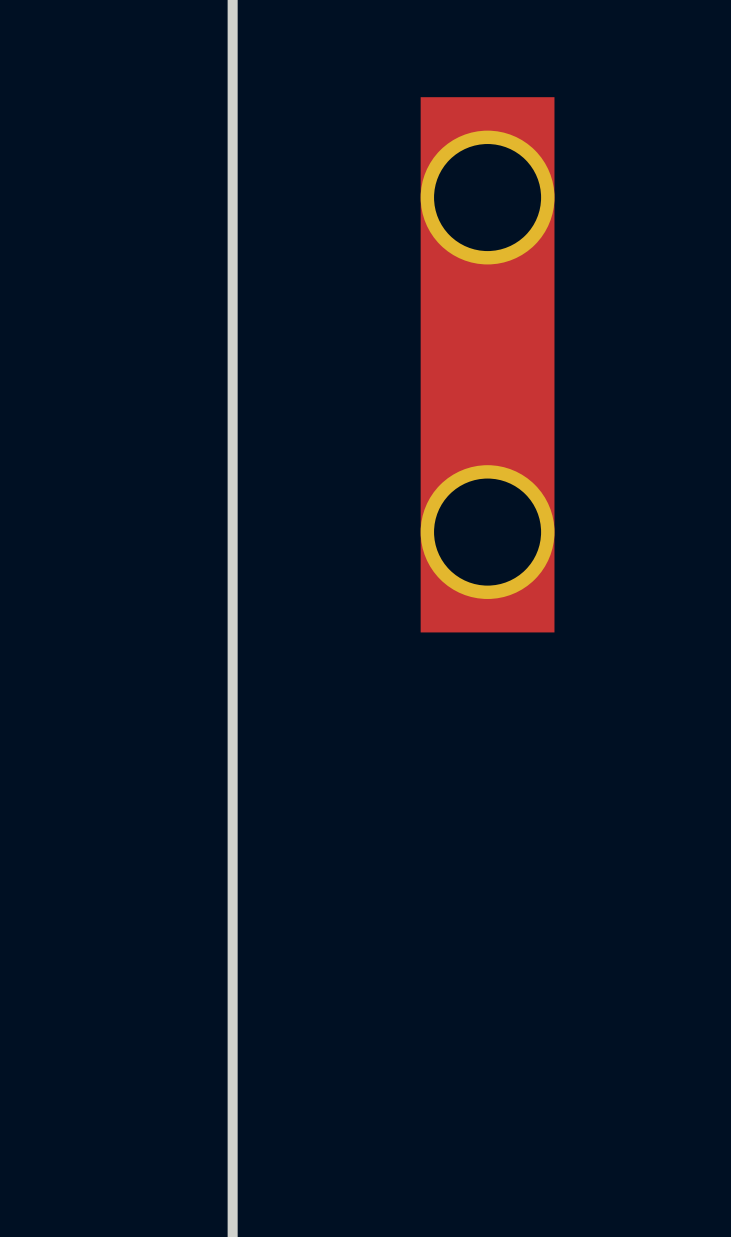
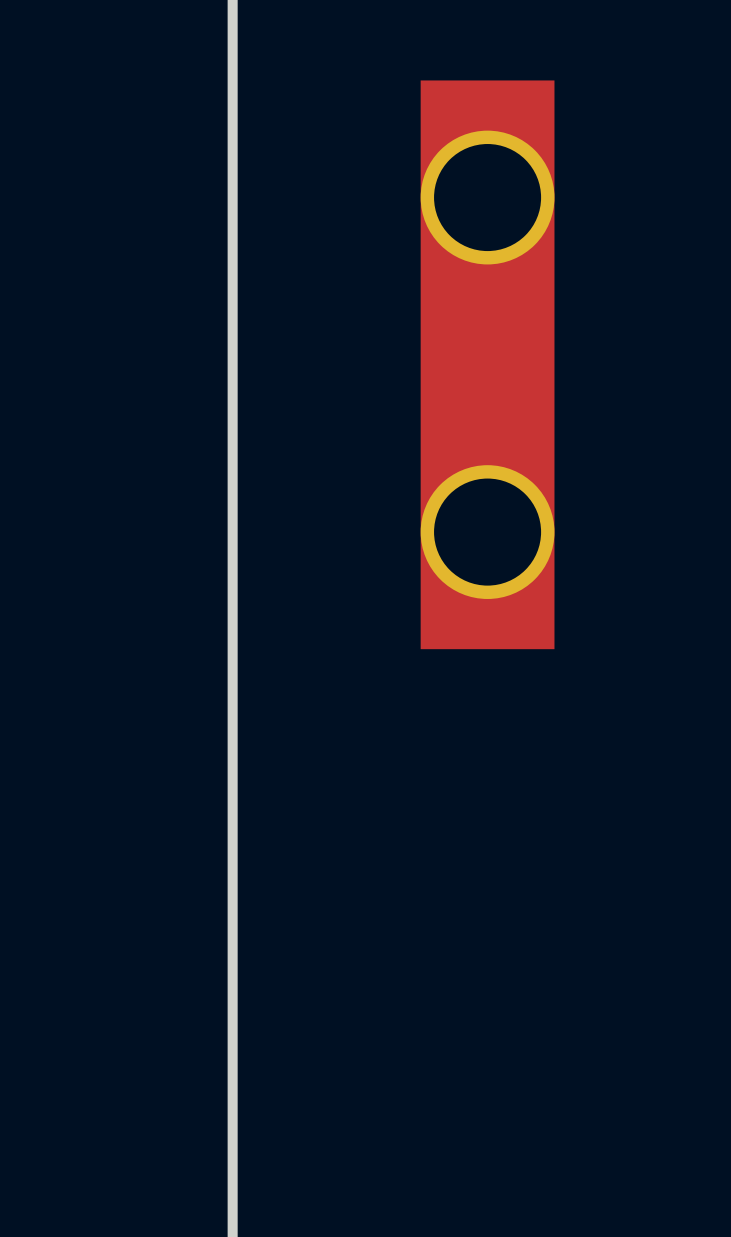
part footprint: [420, 97, 555, 633] -> [420, 80, 555, 650]

